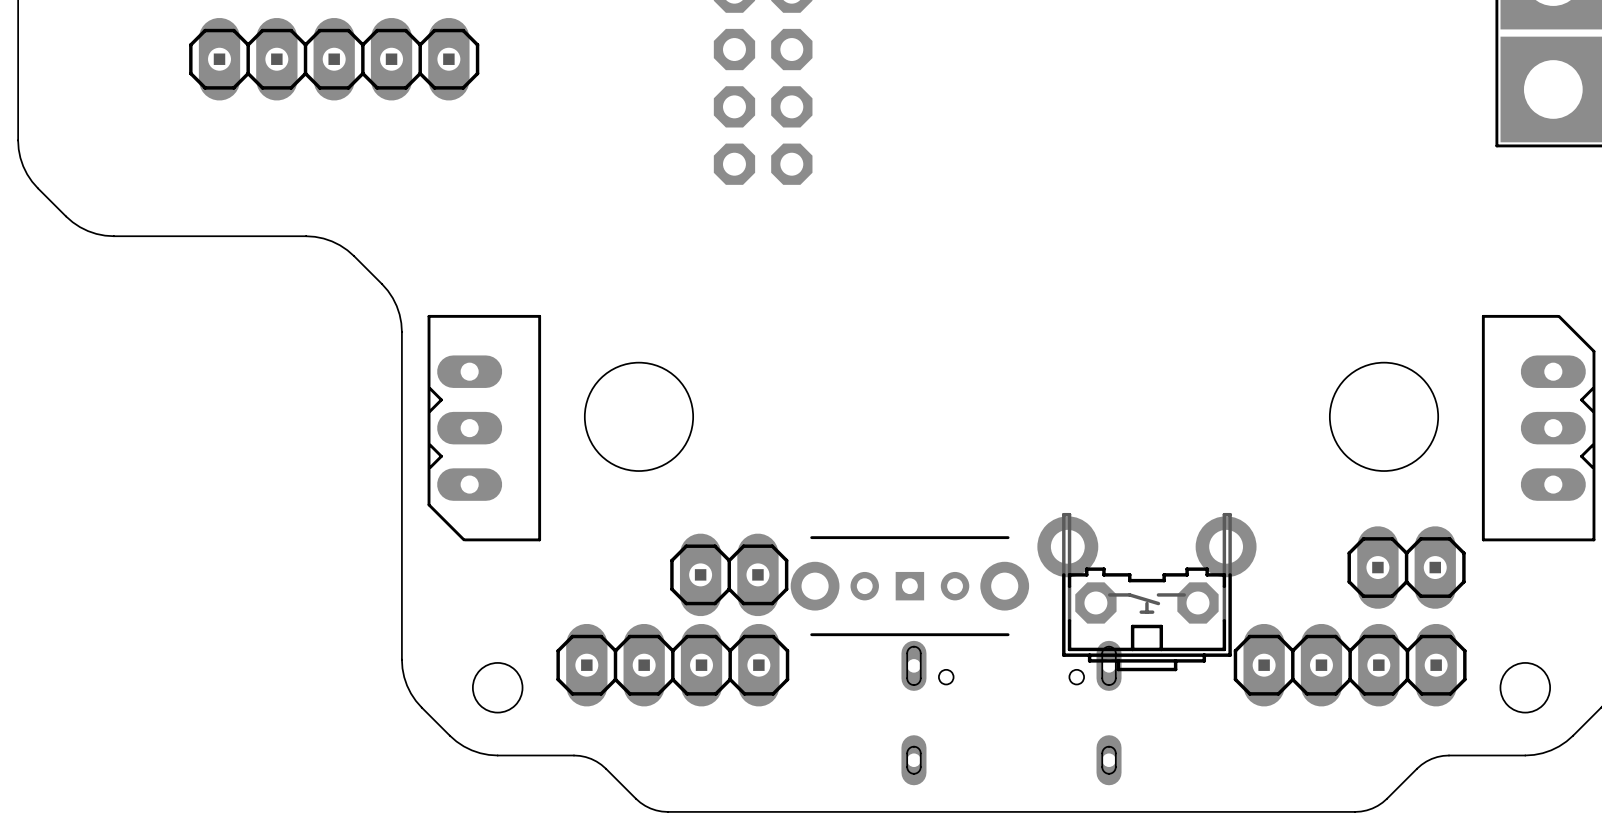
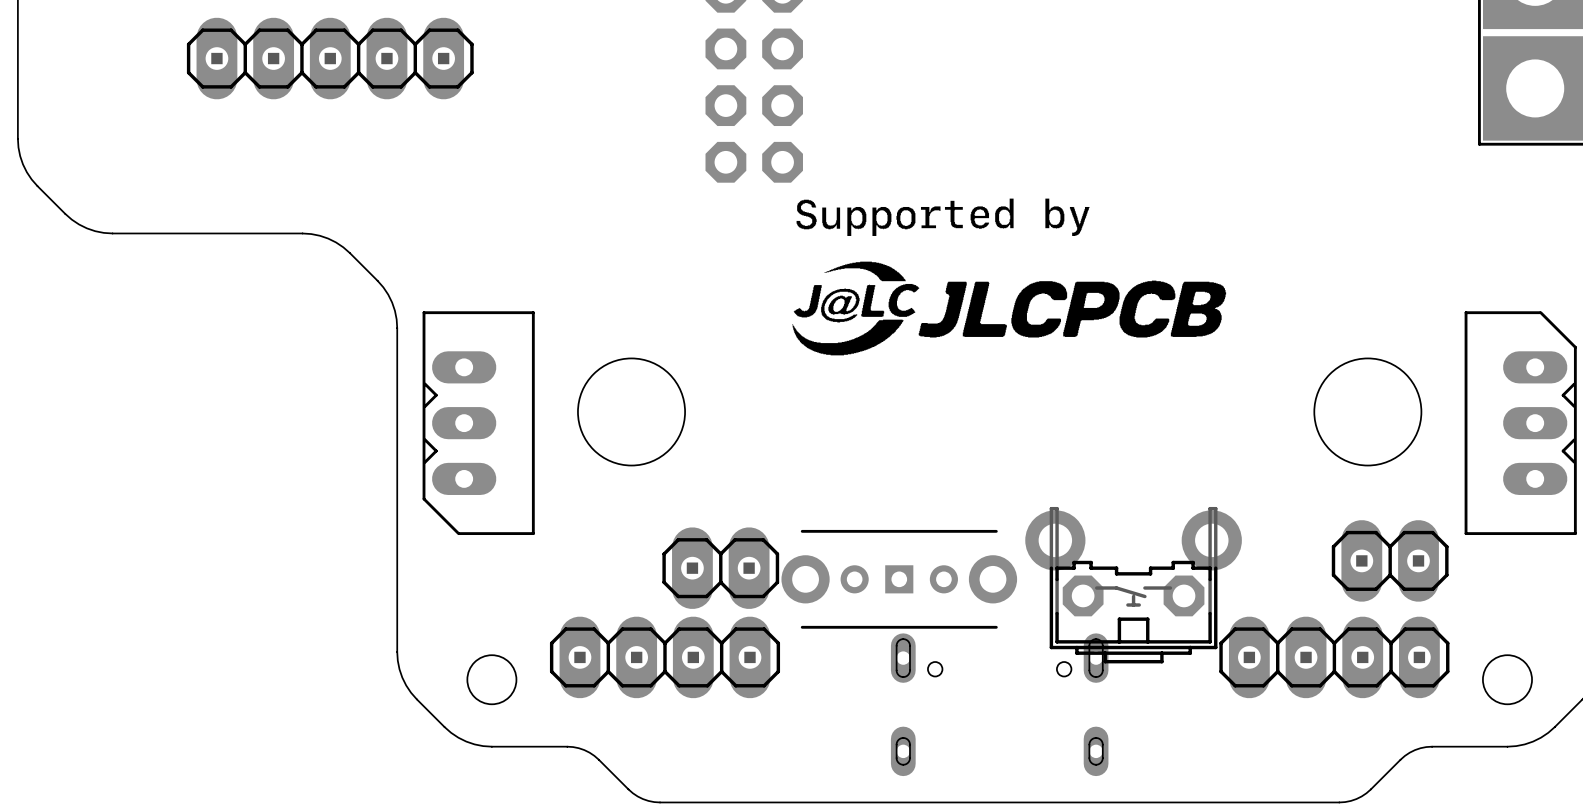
drawing: none -> [792, 198, 1227, 356]
drawing: none -> [1045, 198, 1090, 236]

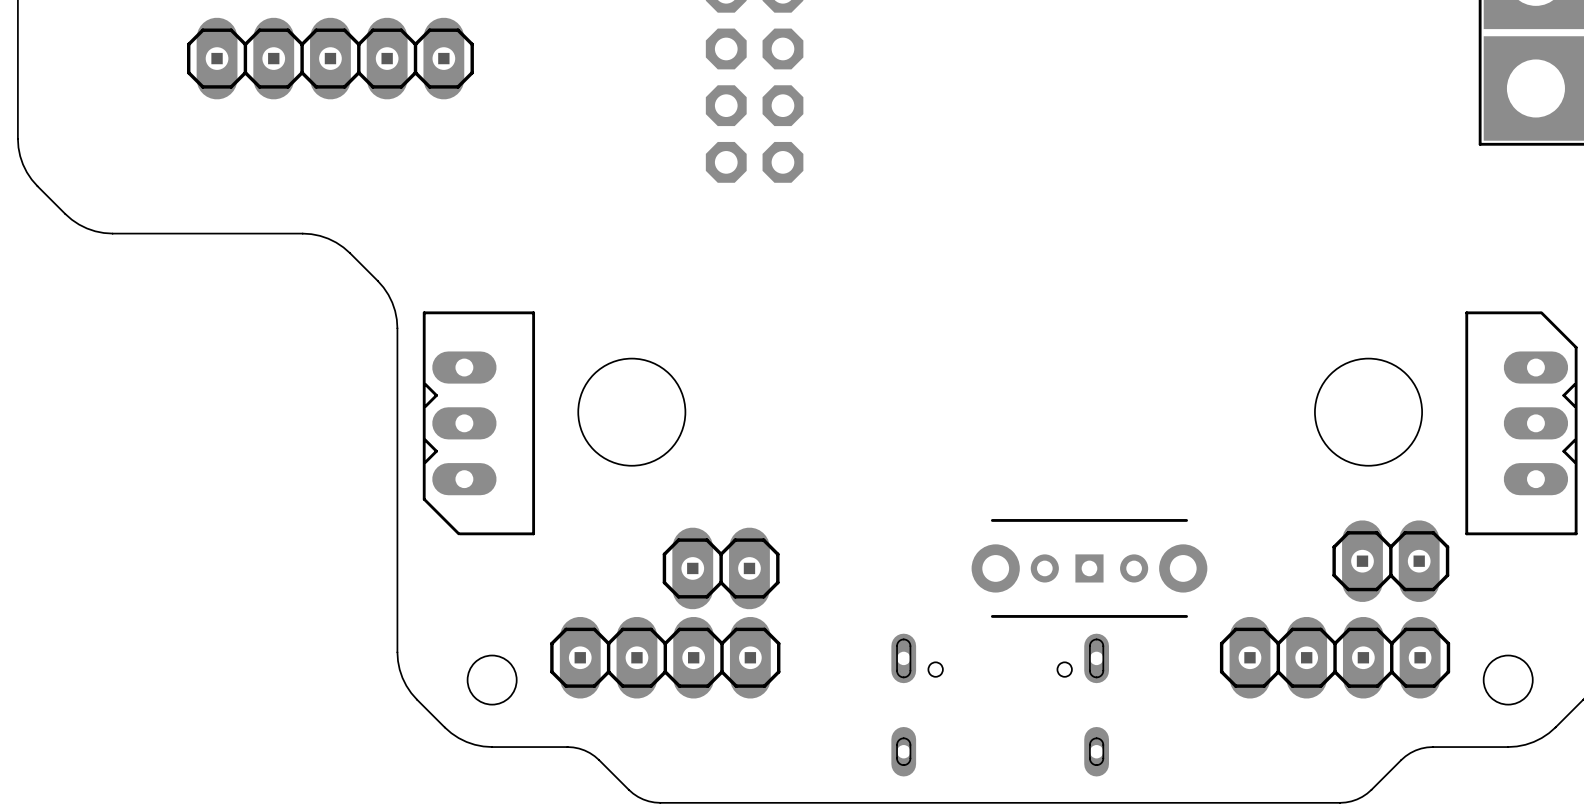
drawing: [792, 198, 1227, 356] -> none
drawing: [1045, 198, 1090, 236] -> none
part position: (899, 579) -> (1089, 568)
part: (1133, 585) -> none

